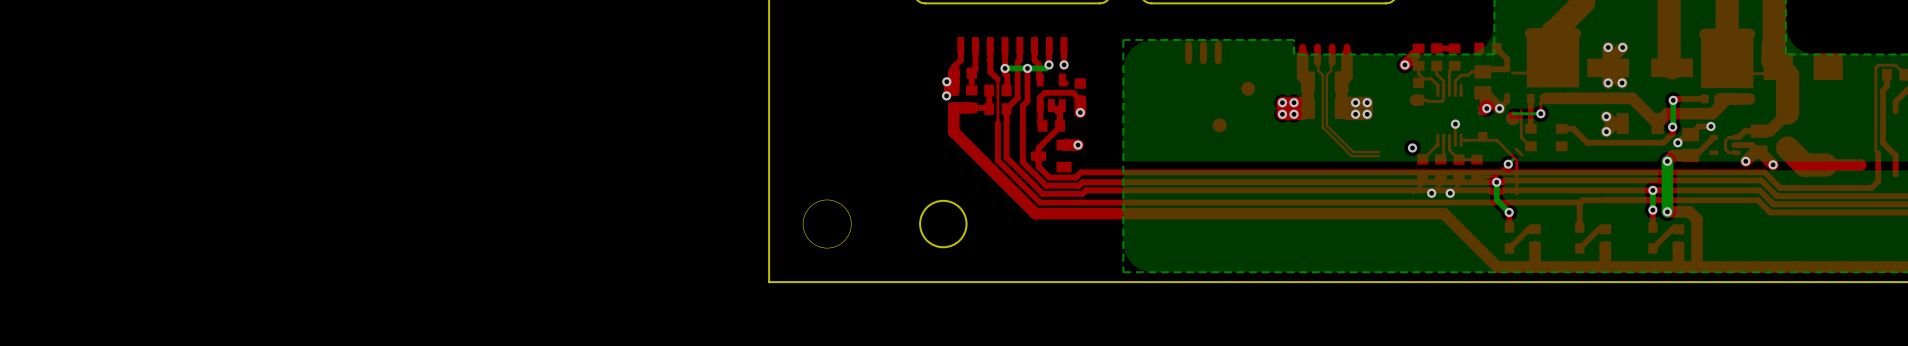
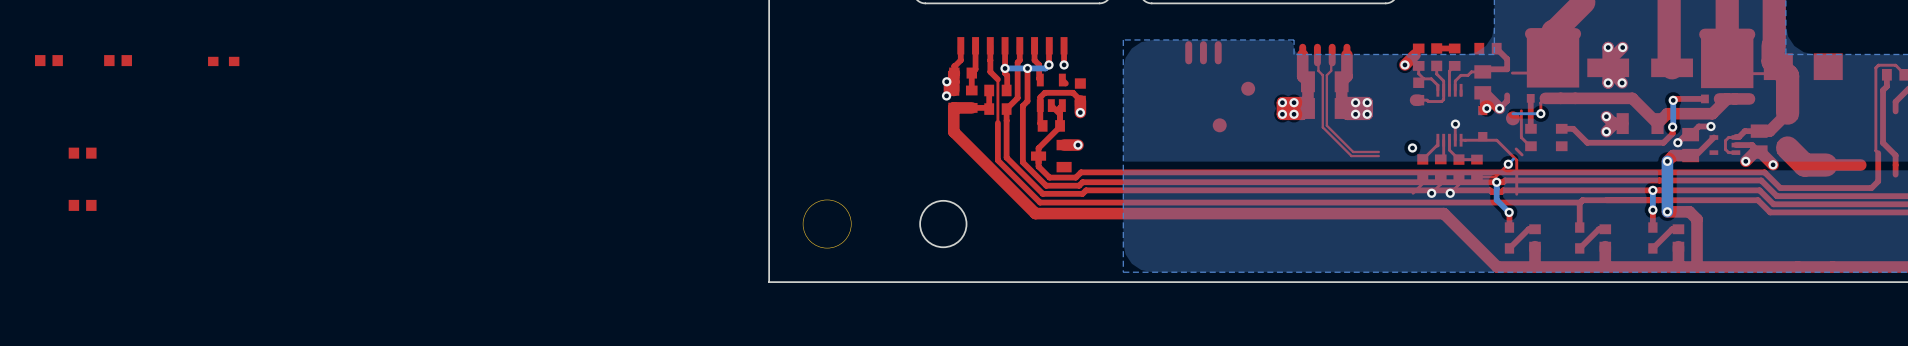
part: none -> (48, 60)
part: none -> (118, 60)
part: none -> (223, 61)
part: none -> (82, 153)
part: none -> (82, 205)

